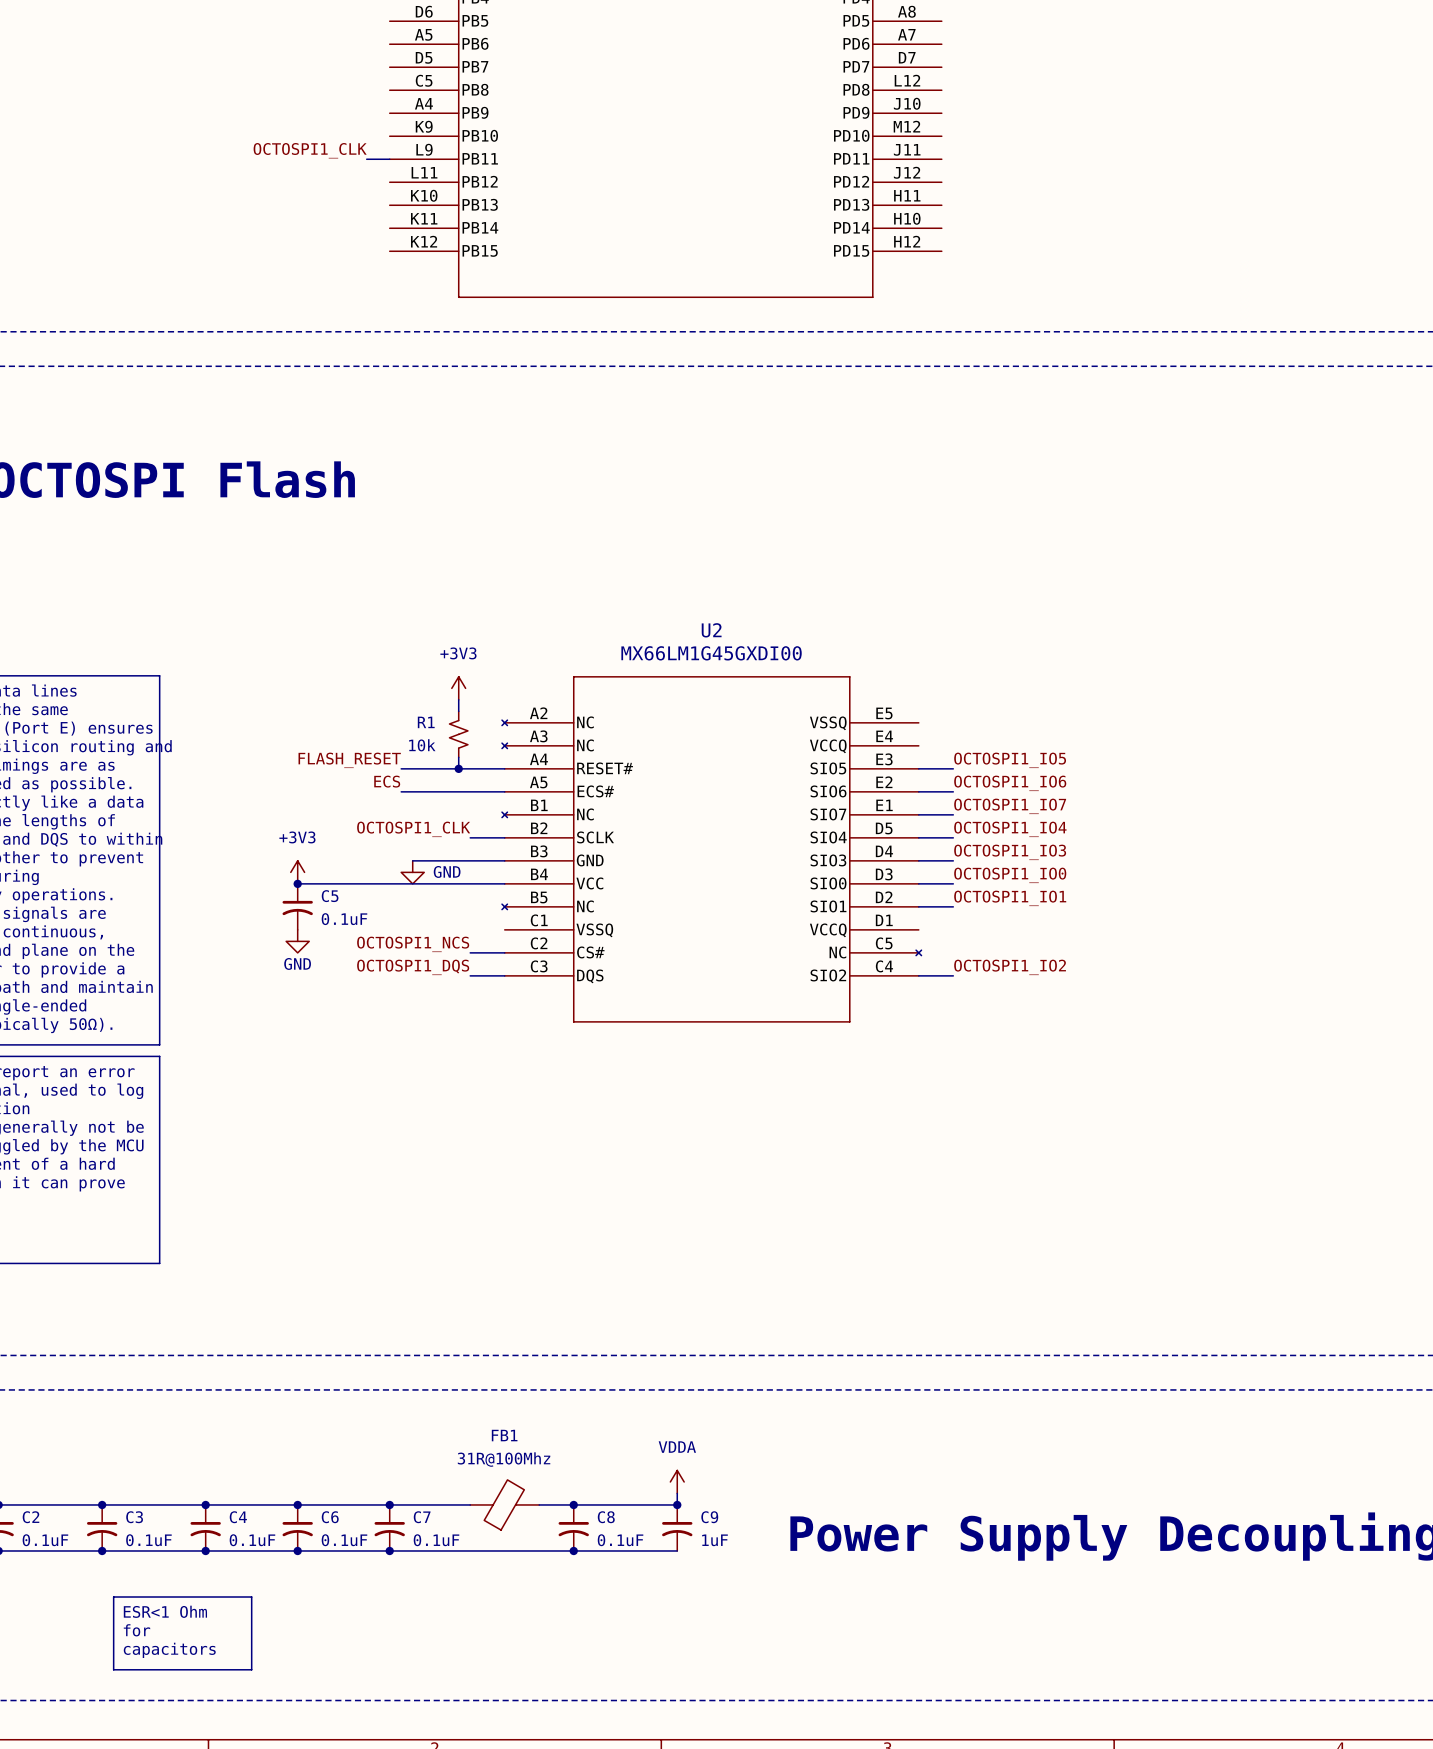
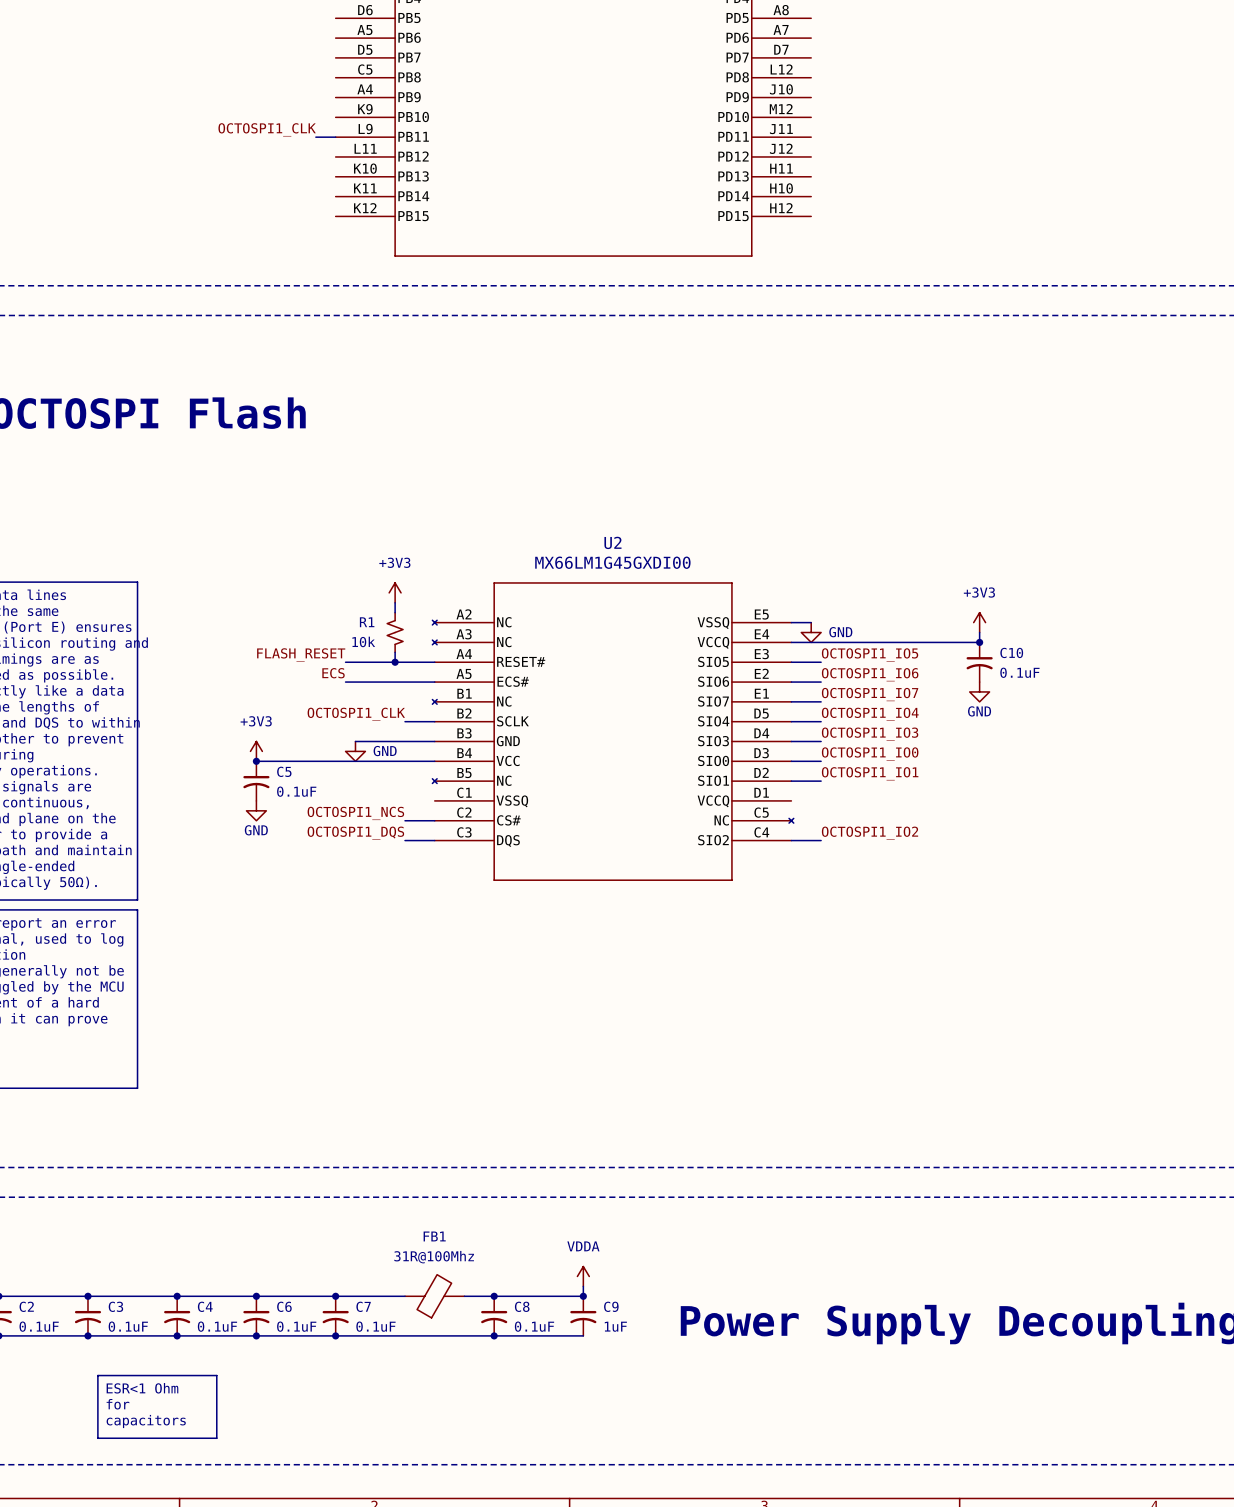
wire: none -> (791, 622) (811, 622)
power symbol: none -> +3V3 (979, 622)
power symbol: none -> GND (811, 632)
wire: none -> (979, 632) (979, 642) (791, 642)
junction: none -> (979, 642)
C10: none -> 0.1uF (979, 662)
power symbol: none -> GND (979, 691)

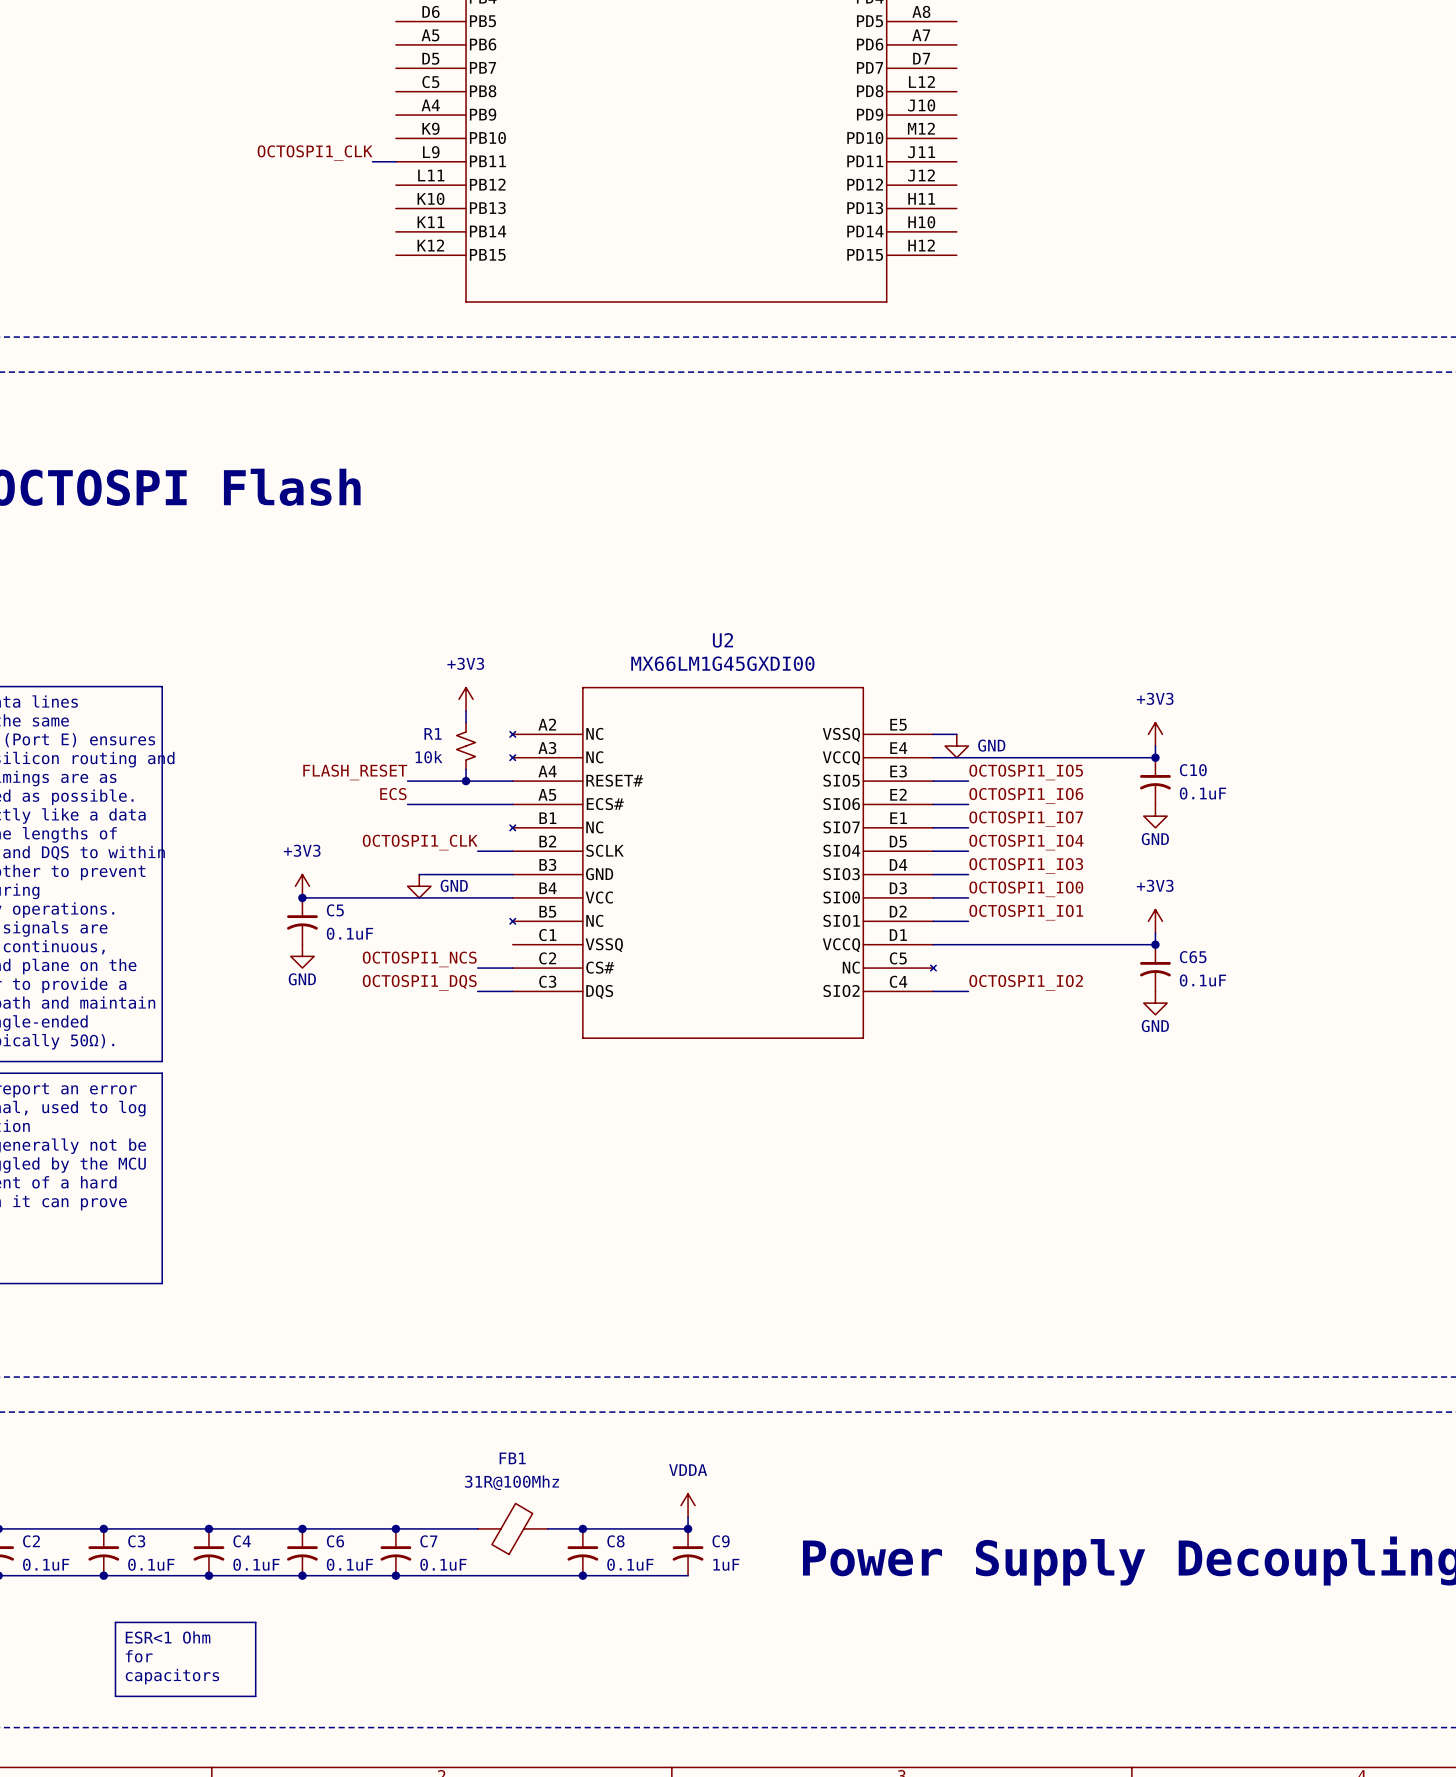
power symbol: none -> +3V3 (1155, 921)
wire: none -> (1155, 933) (1155, 944) (933, 944)
junction: none -> (1155, 944)
C65: none -> 0.1uF (1155, 968)
power symbol: none -> GND (1155, 1003)

